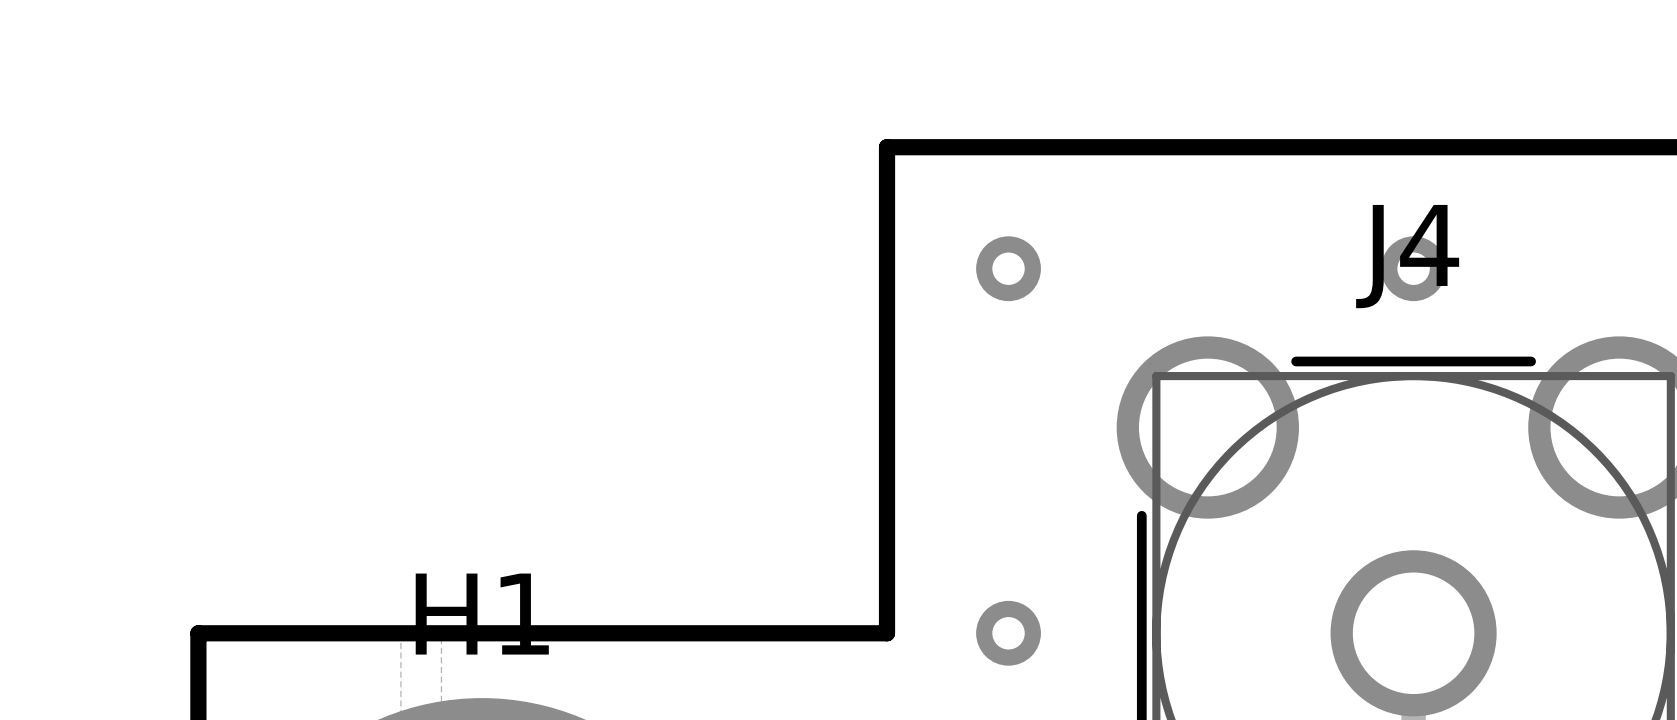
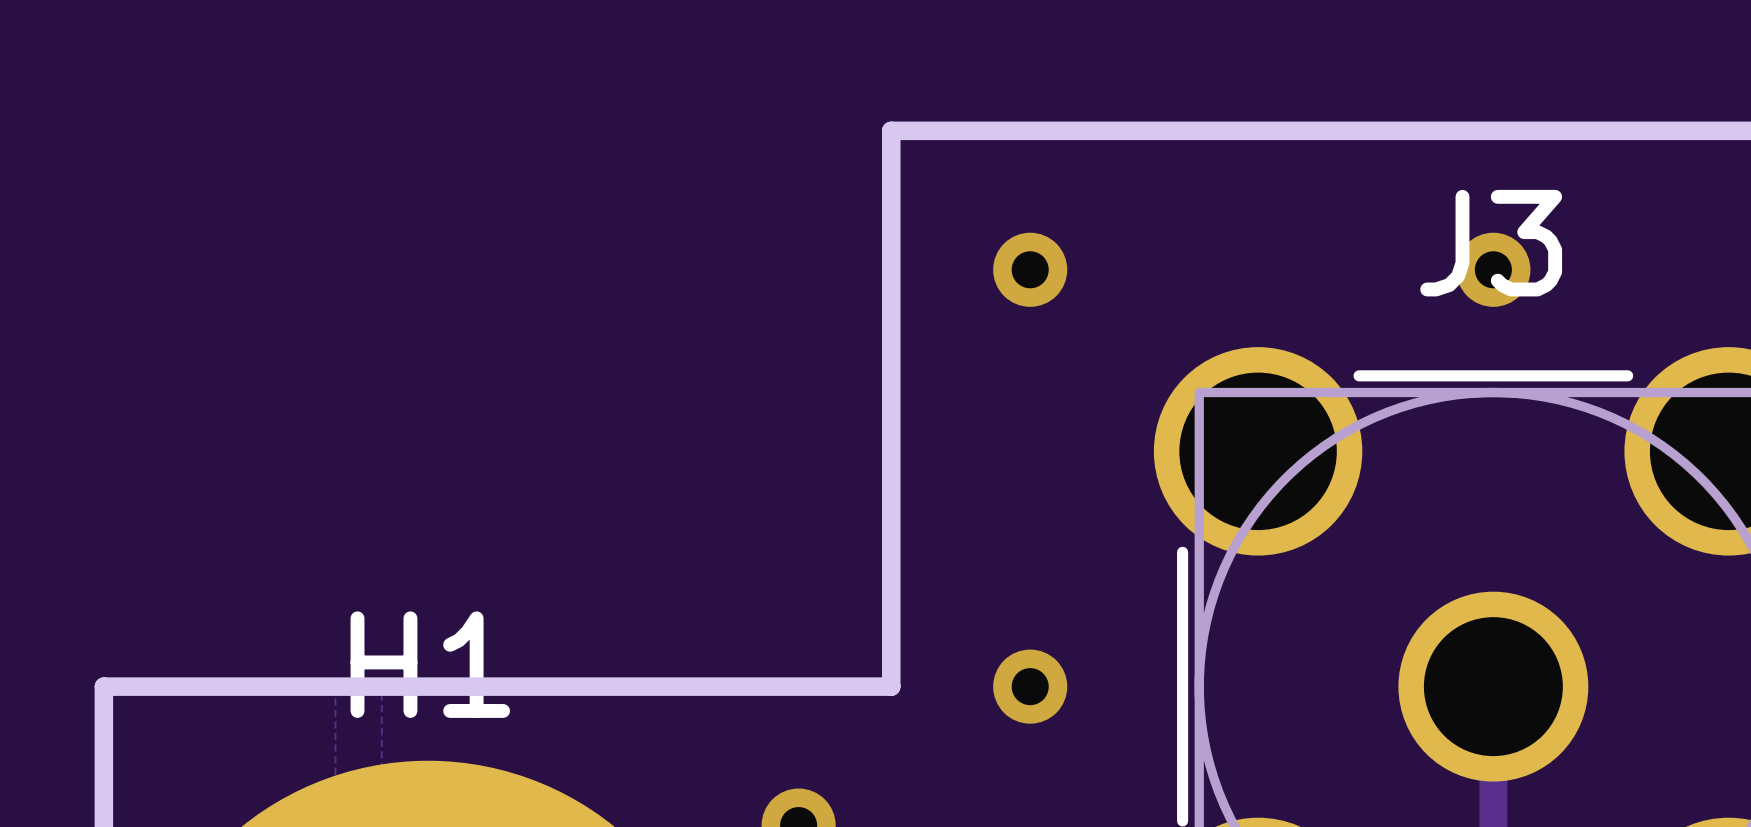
J4 name: J4 (1407, 256) -> J3 (1491, 243)

